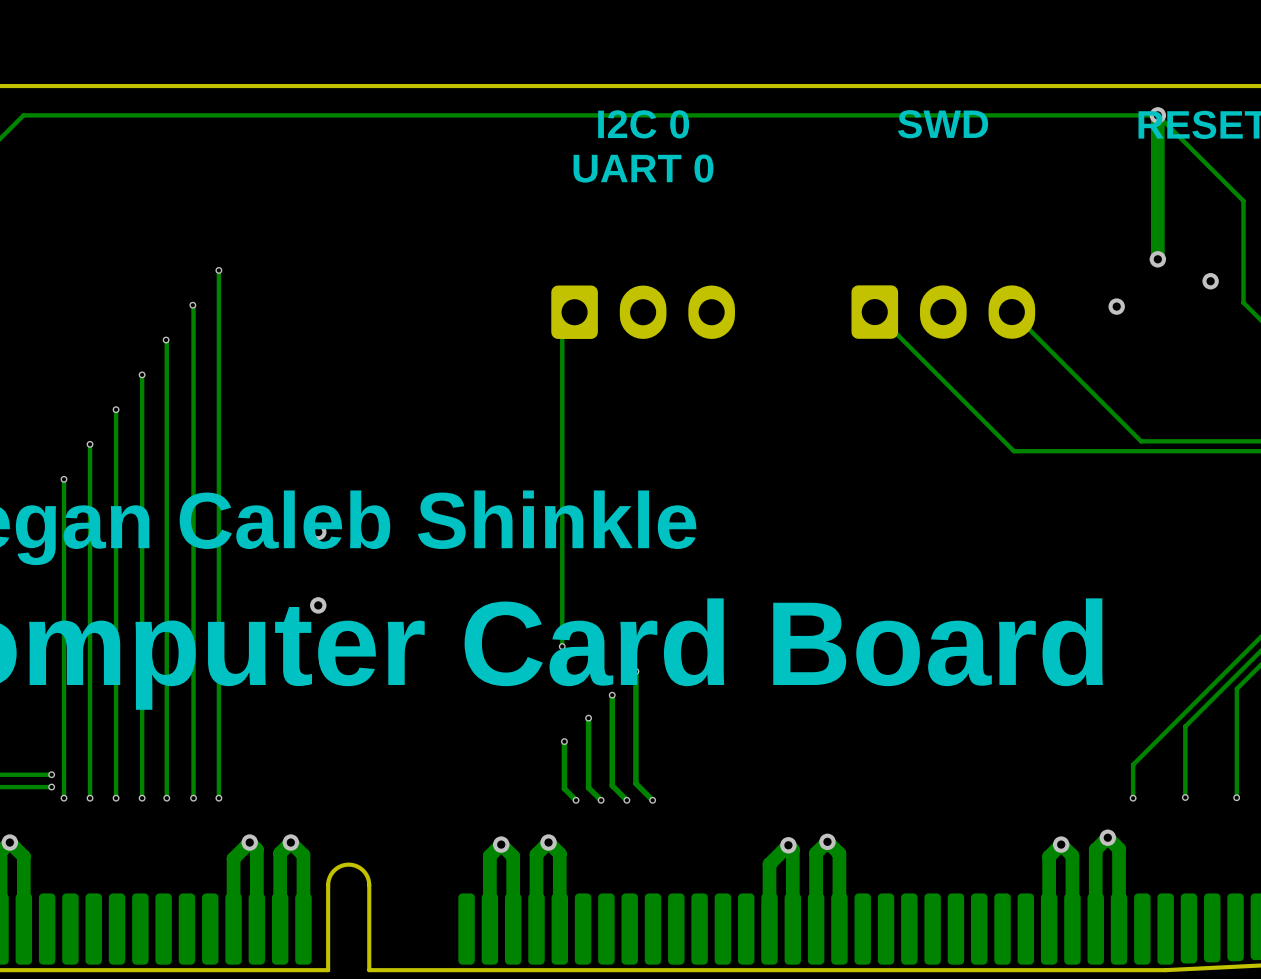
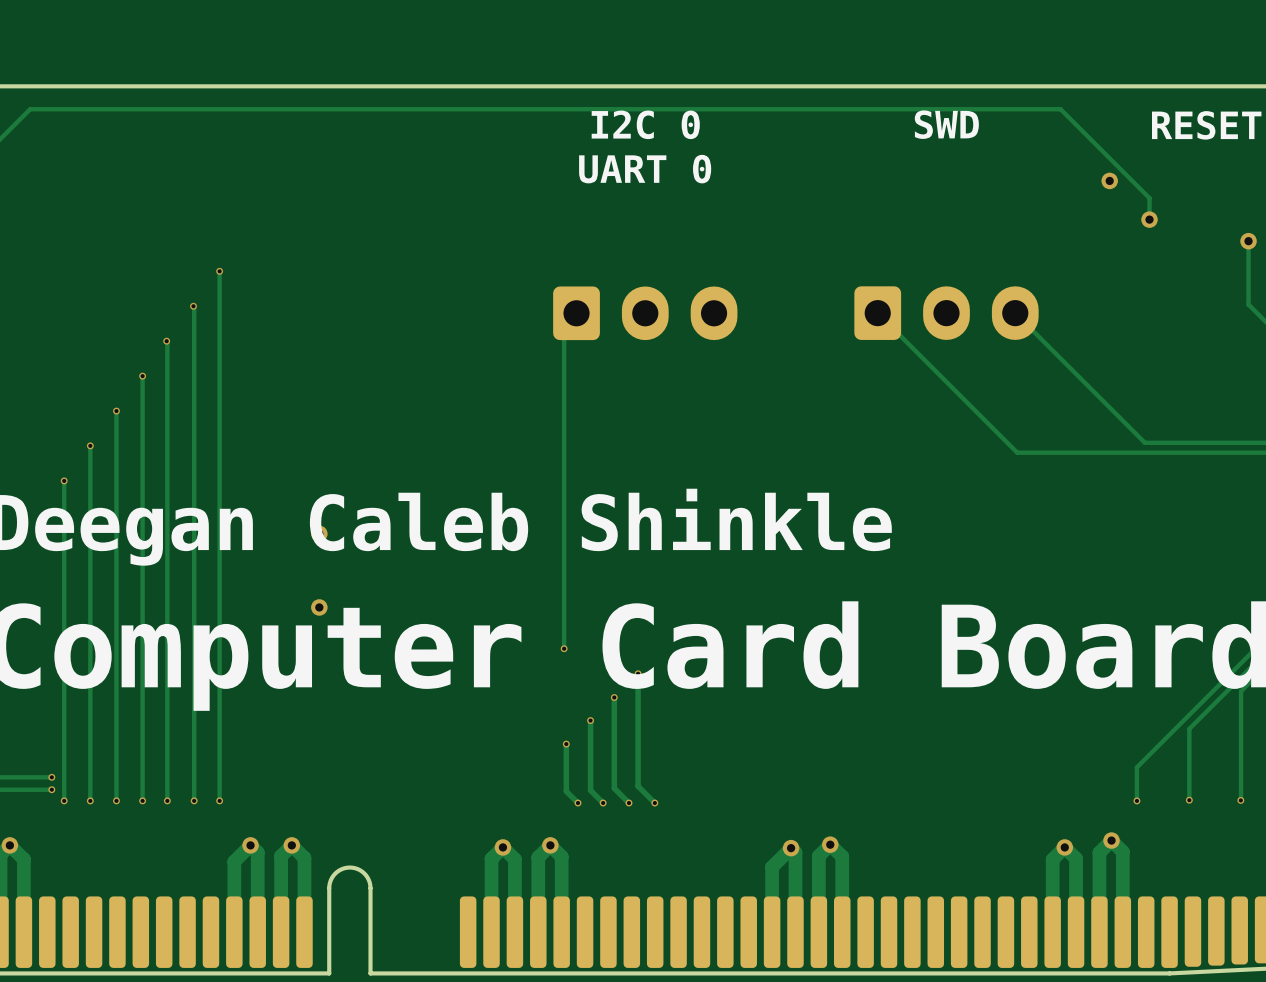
track: (1157, 115) (23, 115) -> (1149, 219) (1149, 198) (1060, 109) (30, 109) (23, 115)
track: (1157, 115) (1243, 201) (1244, 303) -> (1248, 241) (1248, 304)
track: (1157, 115) (1157, 259) -> none
via: (1157, 115) -> none
via: none -> (1109, 180)
via: none -> (1248, 241)
via position: (1157, 259) -> (1149, 219)
via: (1210, 281) -> none
via: (1116, 306) -> none

